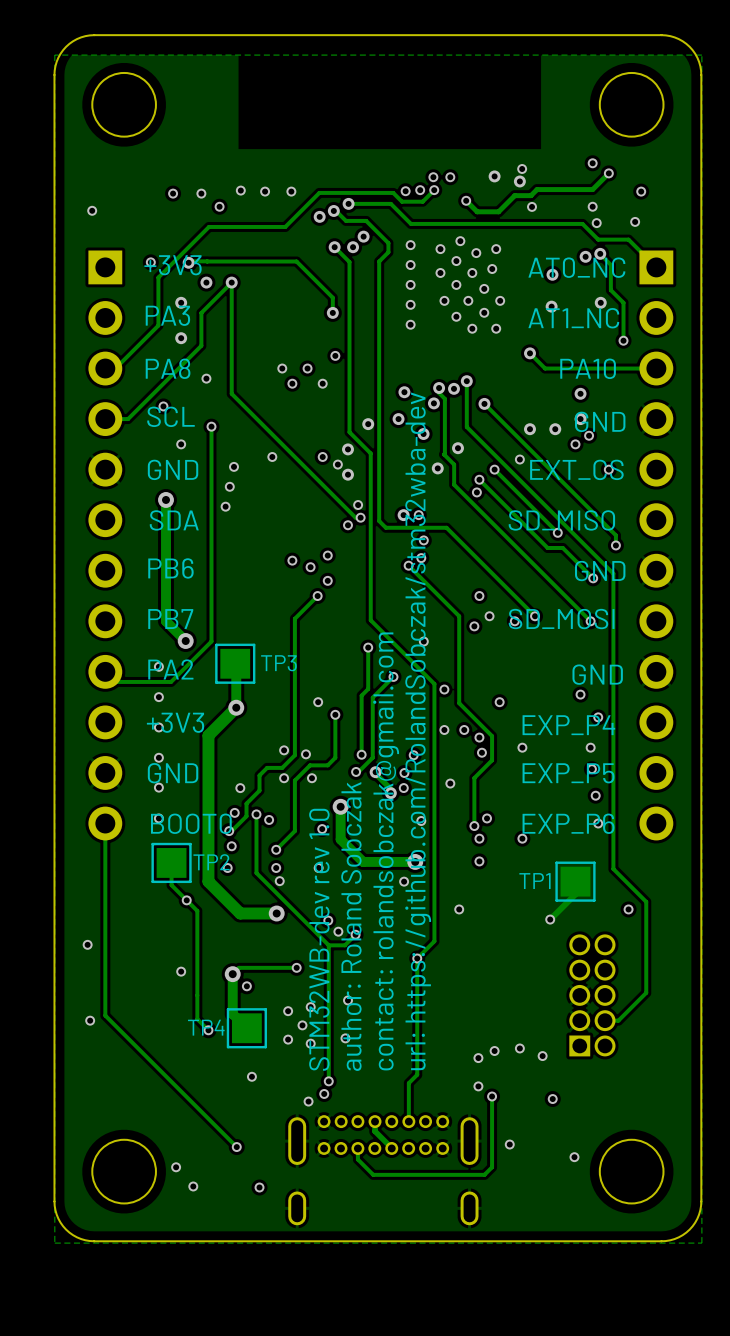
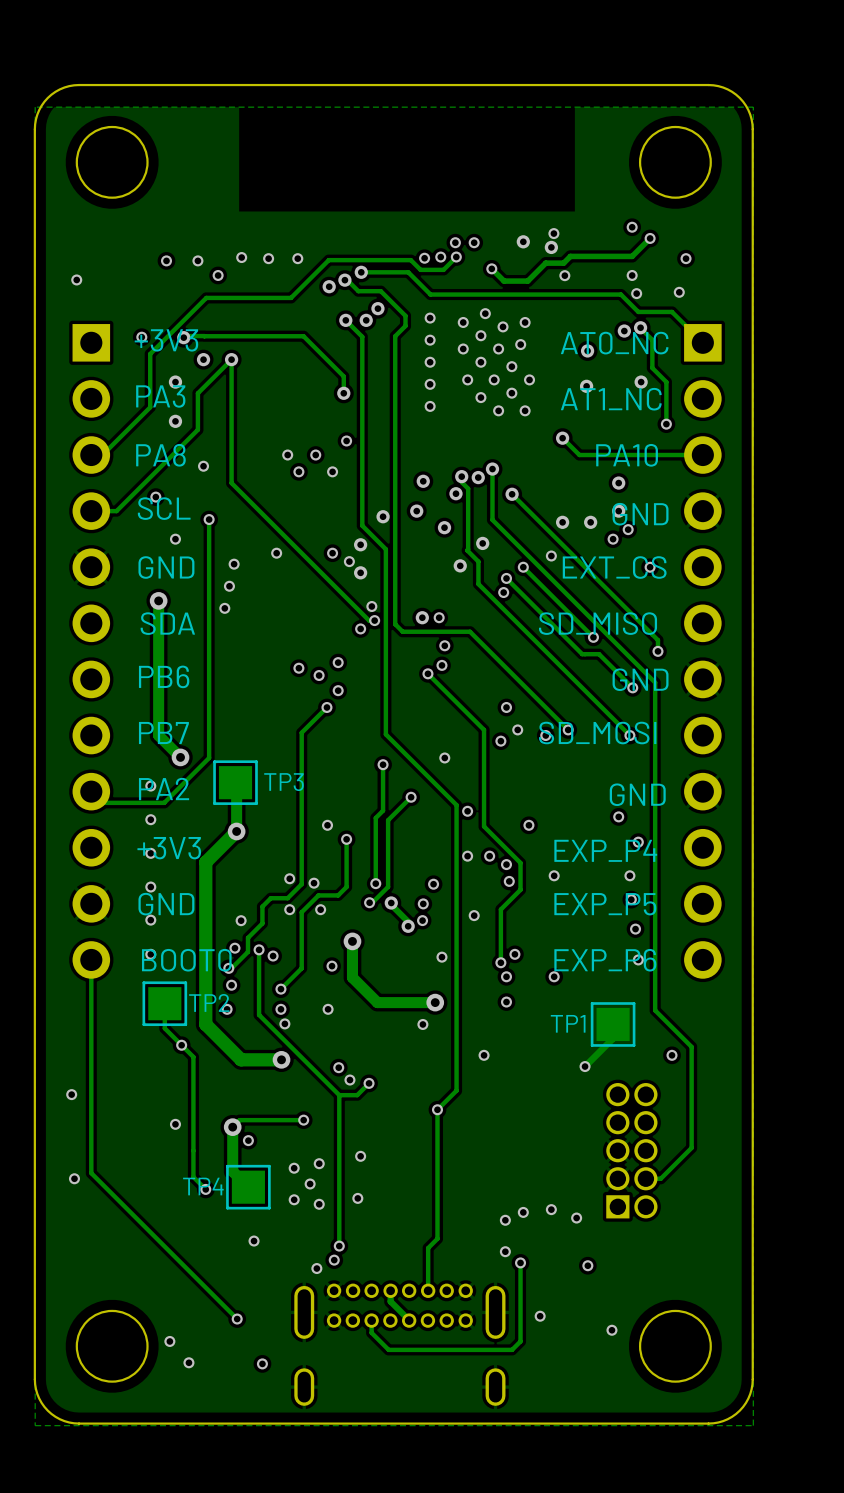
text: url: https://github.com/RolandSobczak/stm32wba-dev (418, 731) -> none
text: contact: rolandsobczak@gmail.com (386, 851) -> none
text: author: Roland Sobczak (351, 926) -> none
text: STM32WB-dev rev 1.0 (319, 939) -> none

